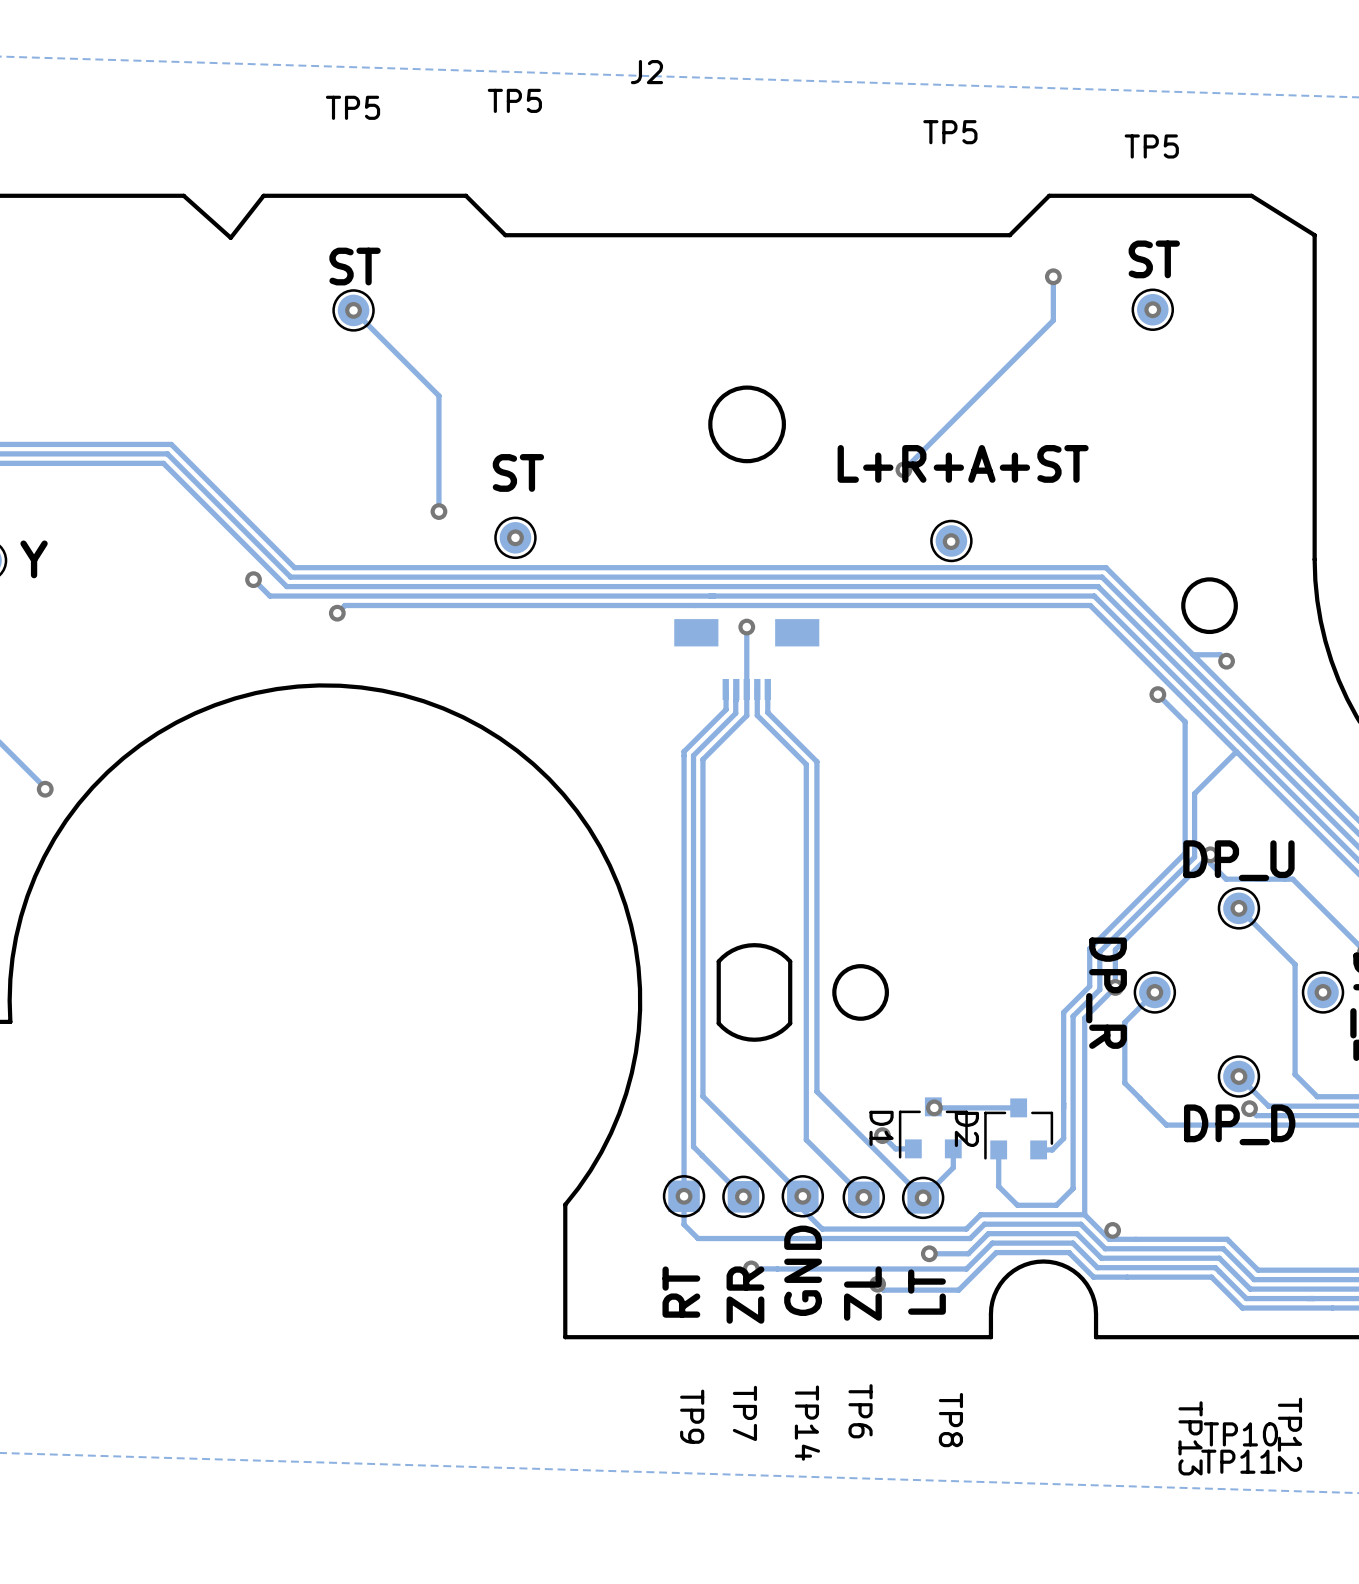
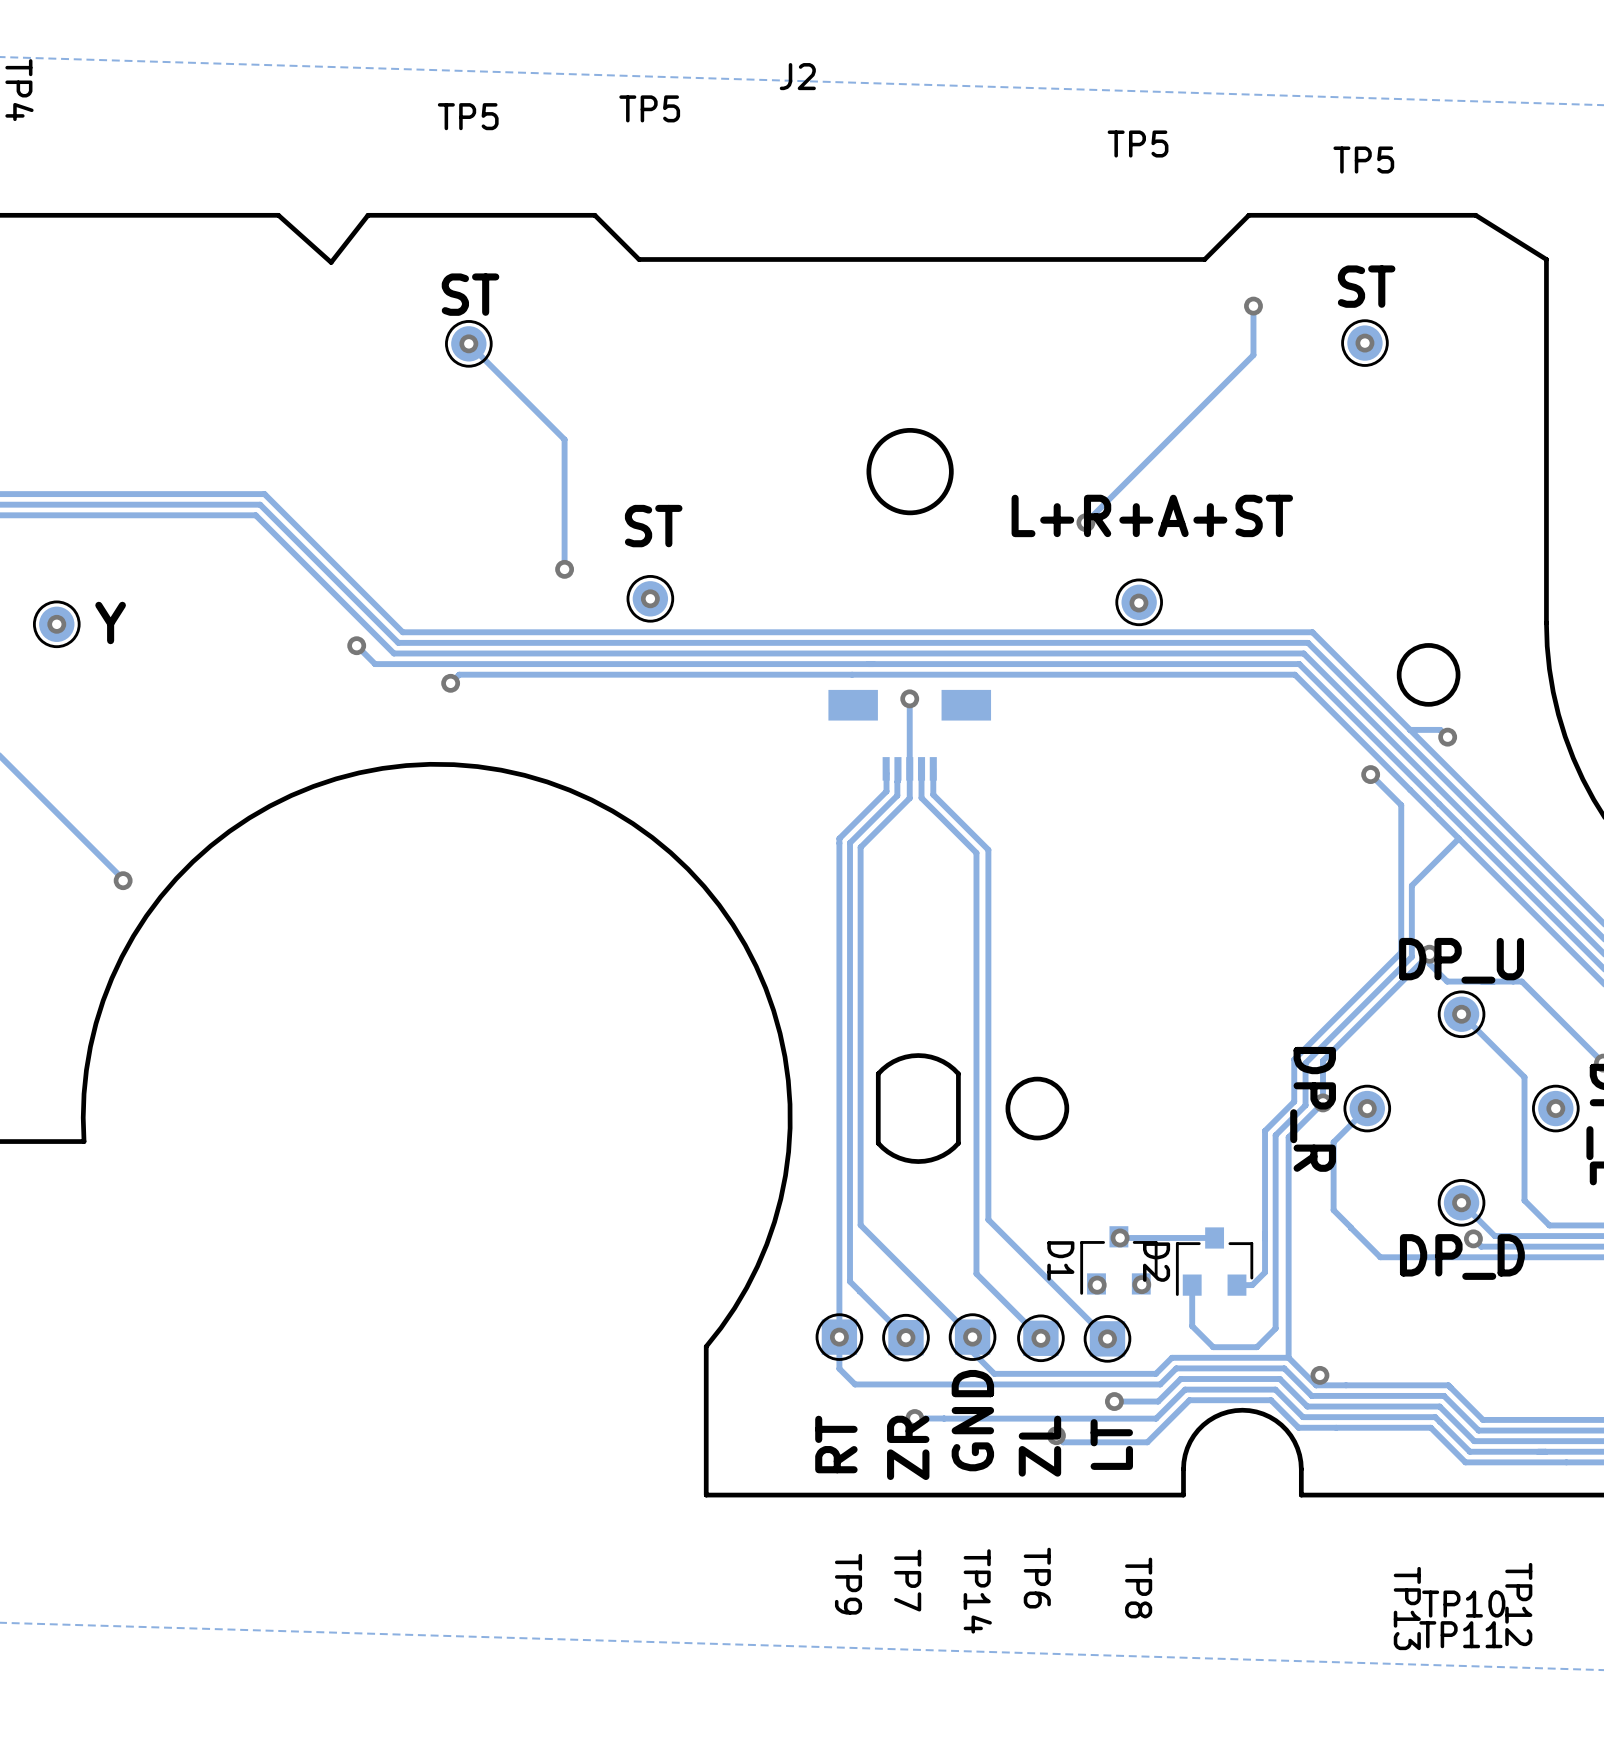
track: (882, 1135) (895, 1148) (913, 1148) -> none
via position: (882, 1135) -> (1097, 1285)
track: (953, 1149) (953, 1167) (923, 1197) -> none
via: none -> (1141, 1284)

